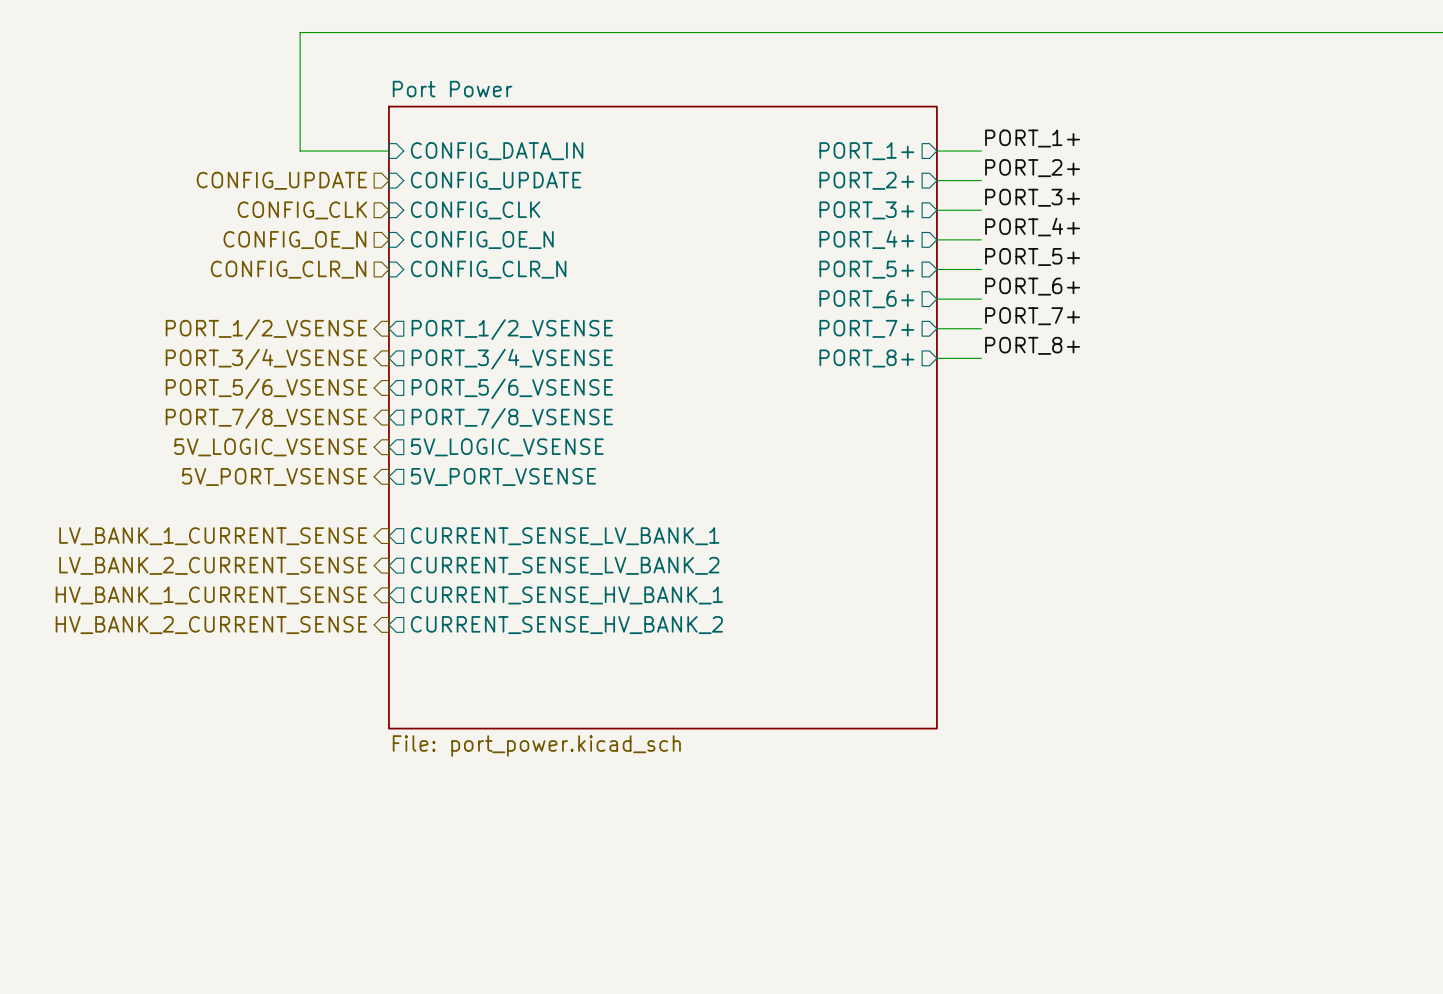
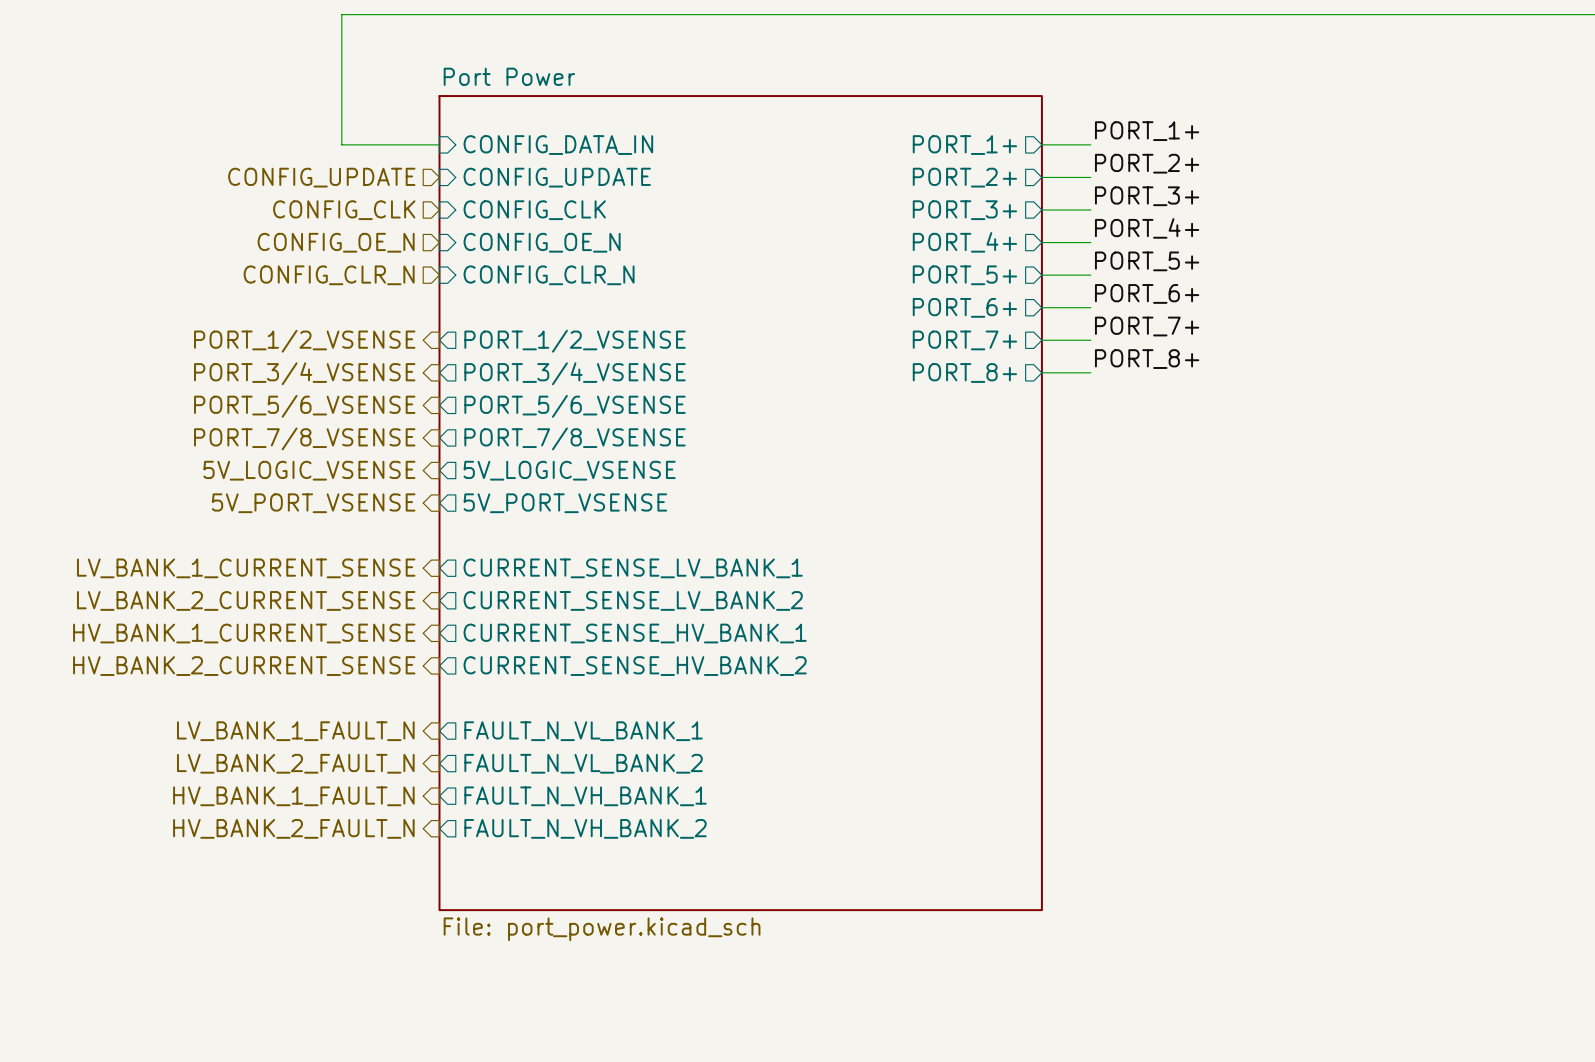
sheet Port Power: File: port_power.kicad_sch (662, 417) -> none
sheet Port Power: none -> File: port_power.kicad_sch (740, 503)
hierarchical label: none -> LV_BANK_1_FAULT_N (295, 731)
sheet pin: none -> FAULT_N_VL_BANK_1 (583, 731)
hierarchical label: none -> LV_BANK_2_FAULT_N (295, 763)
sheet pin: none -> FAULT_N_VL_BANK_2 (583, 763)
hierarchical label: none -> HV_BANK_1_FAULT_N (293, 796)
sheet pin: none -> FAULT_N_VH_BANK_1 (585, 796)
hierarchical label: none -> HV_BANK_2_FAULT_N (293, 828)
sheet pin: none -> FAULT_N_VH_BANK_2 (585, 828)

